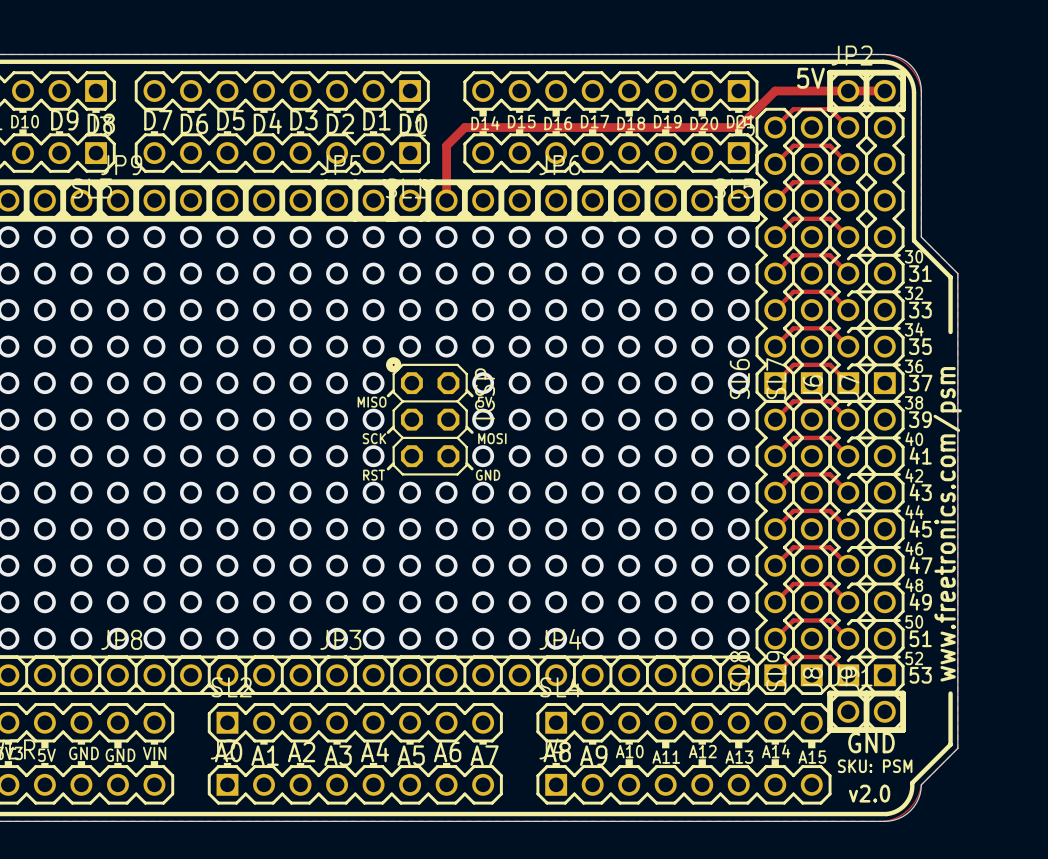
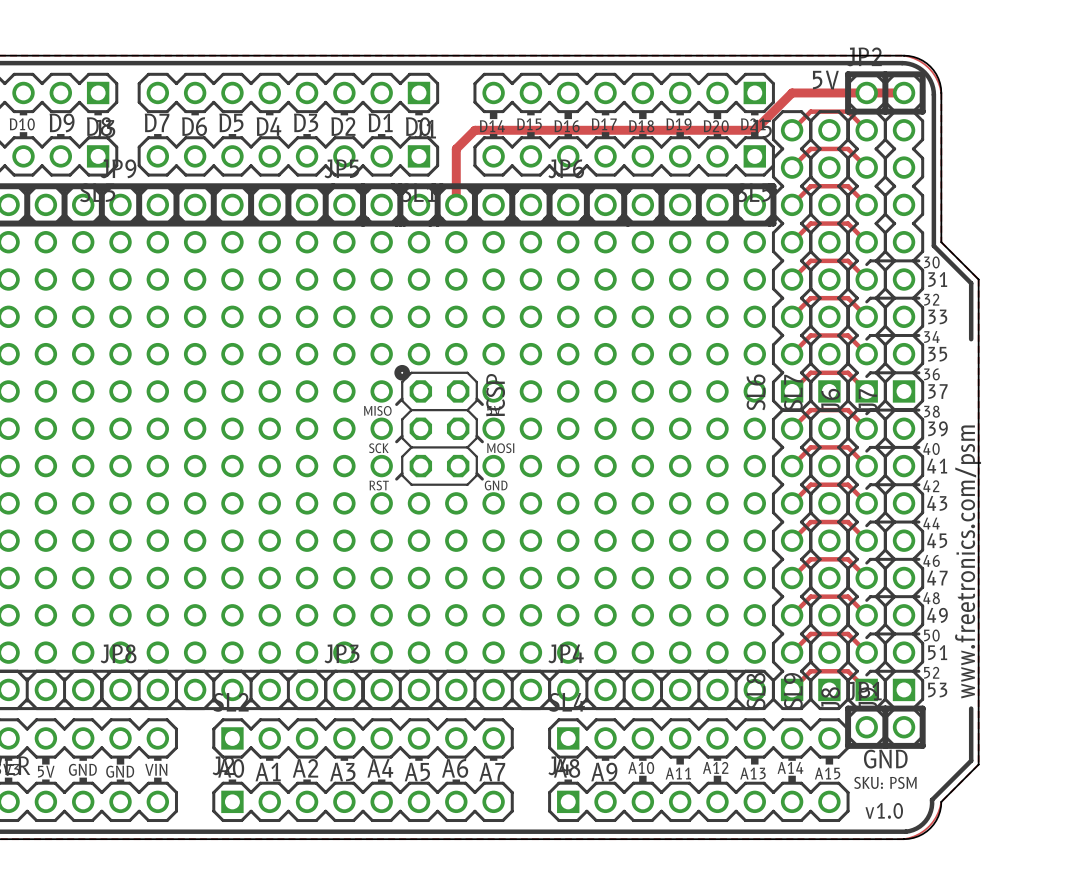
text: v2.0 (869, 793) -> v1.0 (884, 810)

